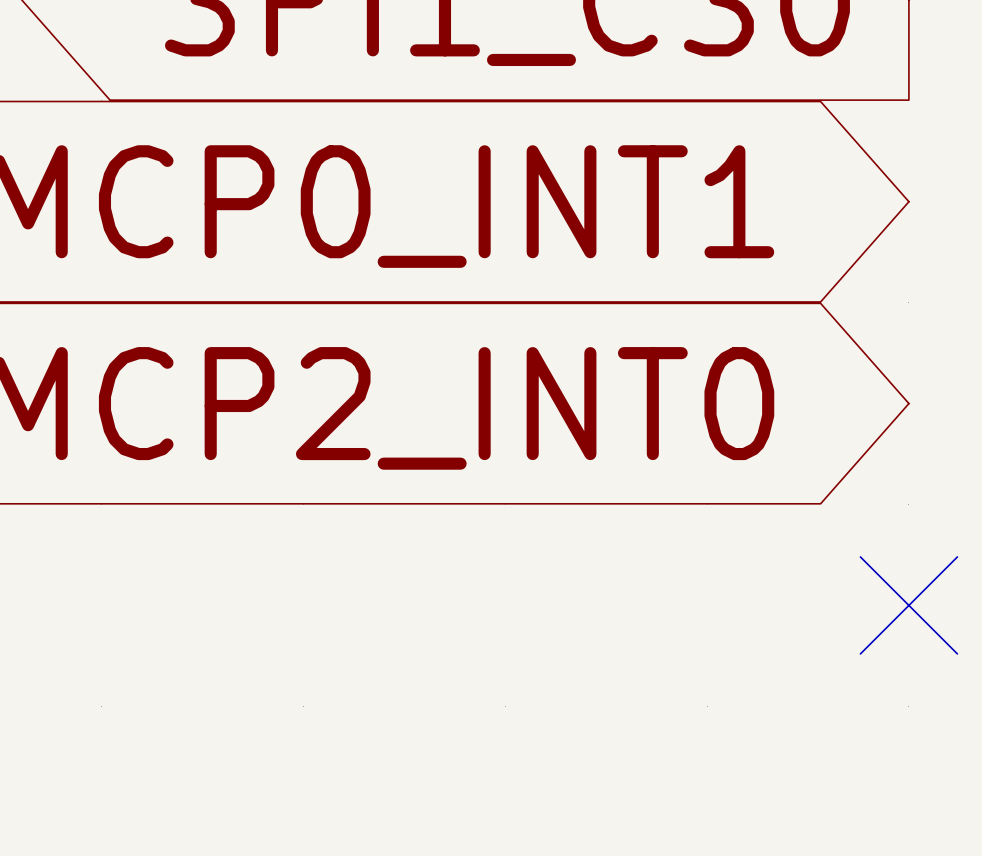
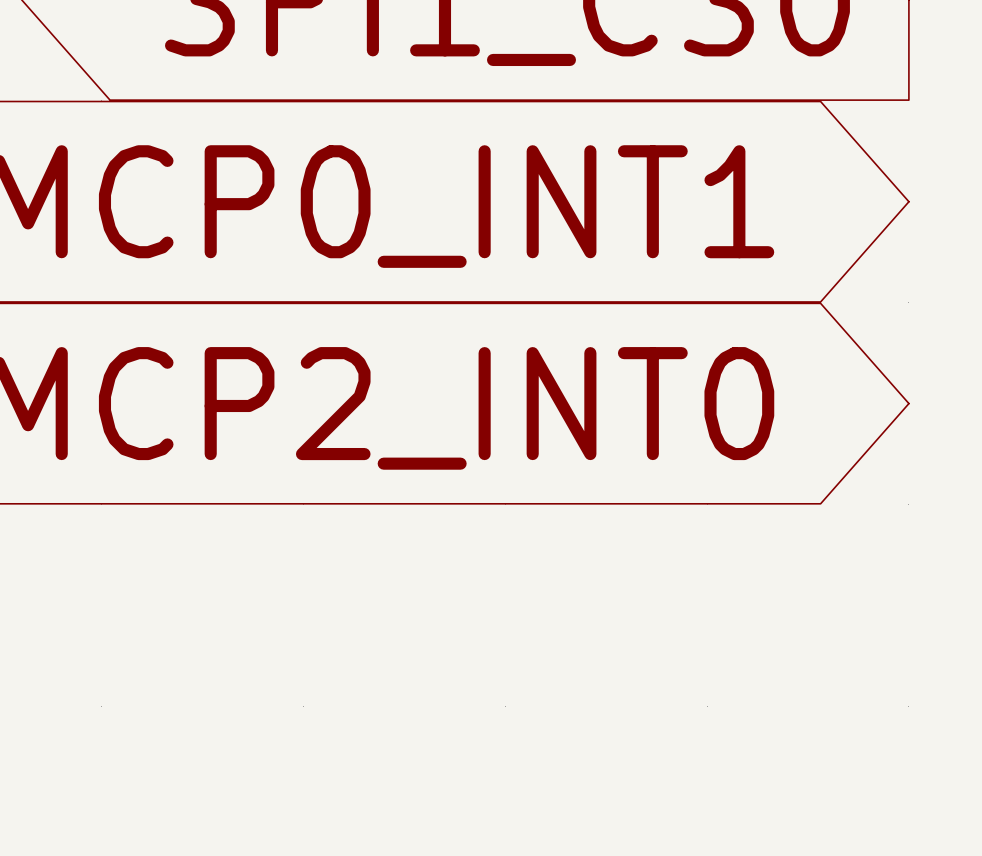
no-connect mark: (908, 605) -> none

